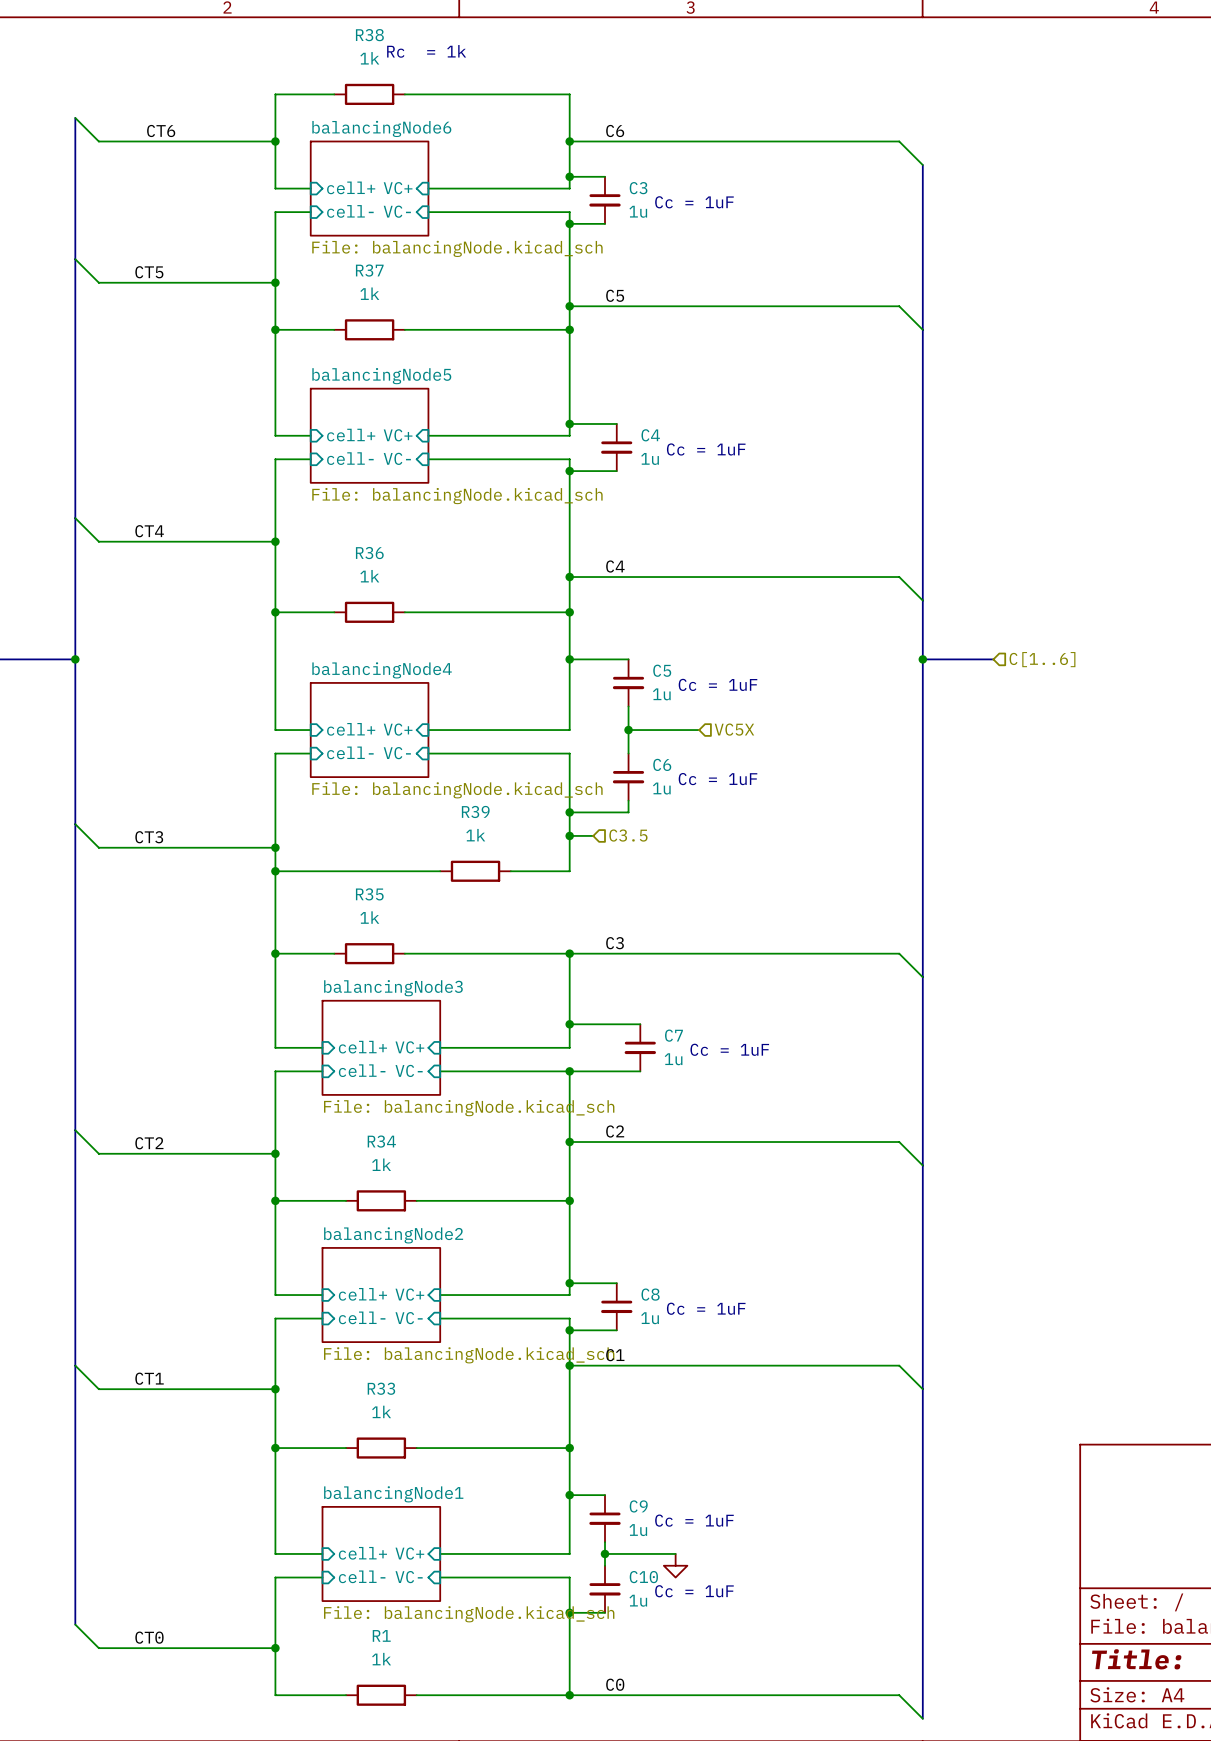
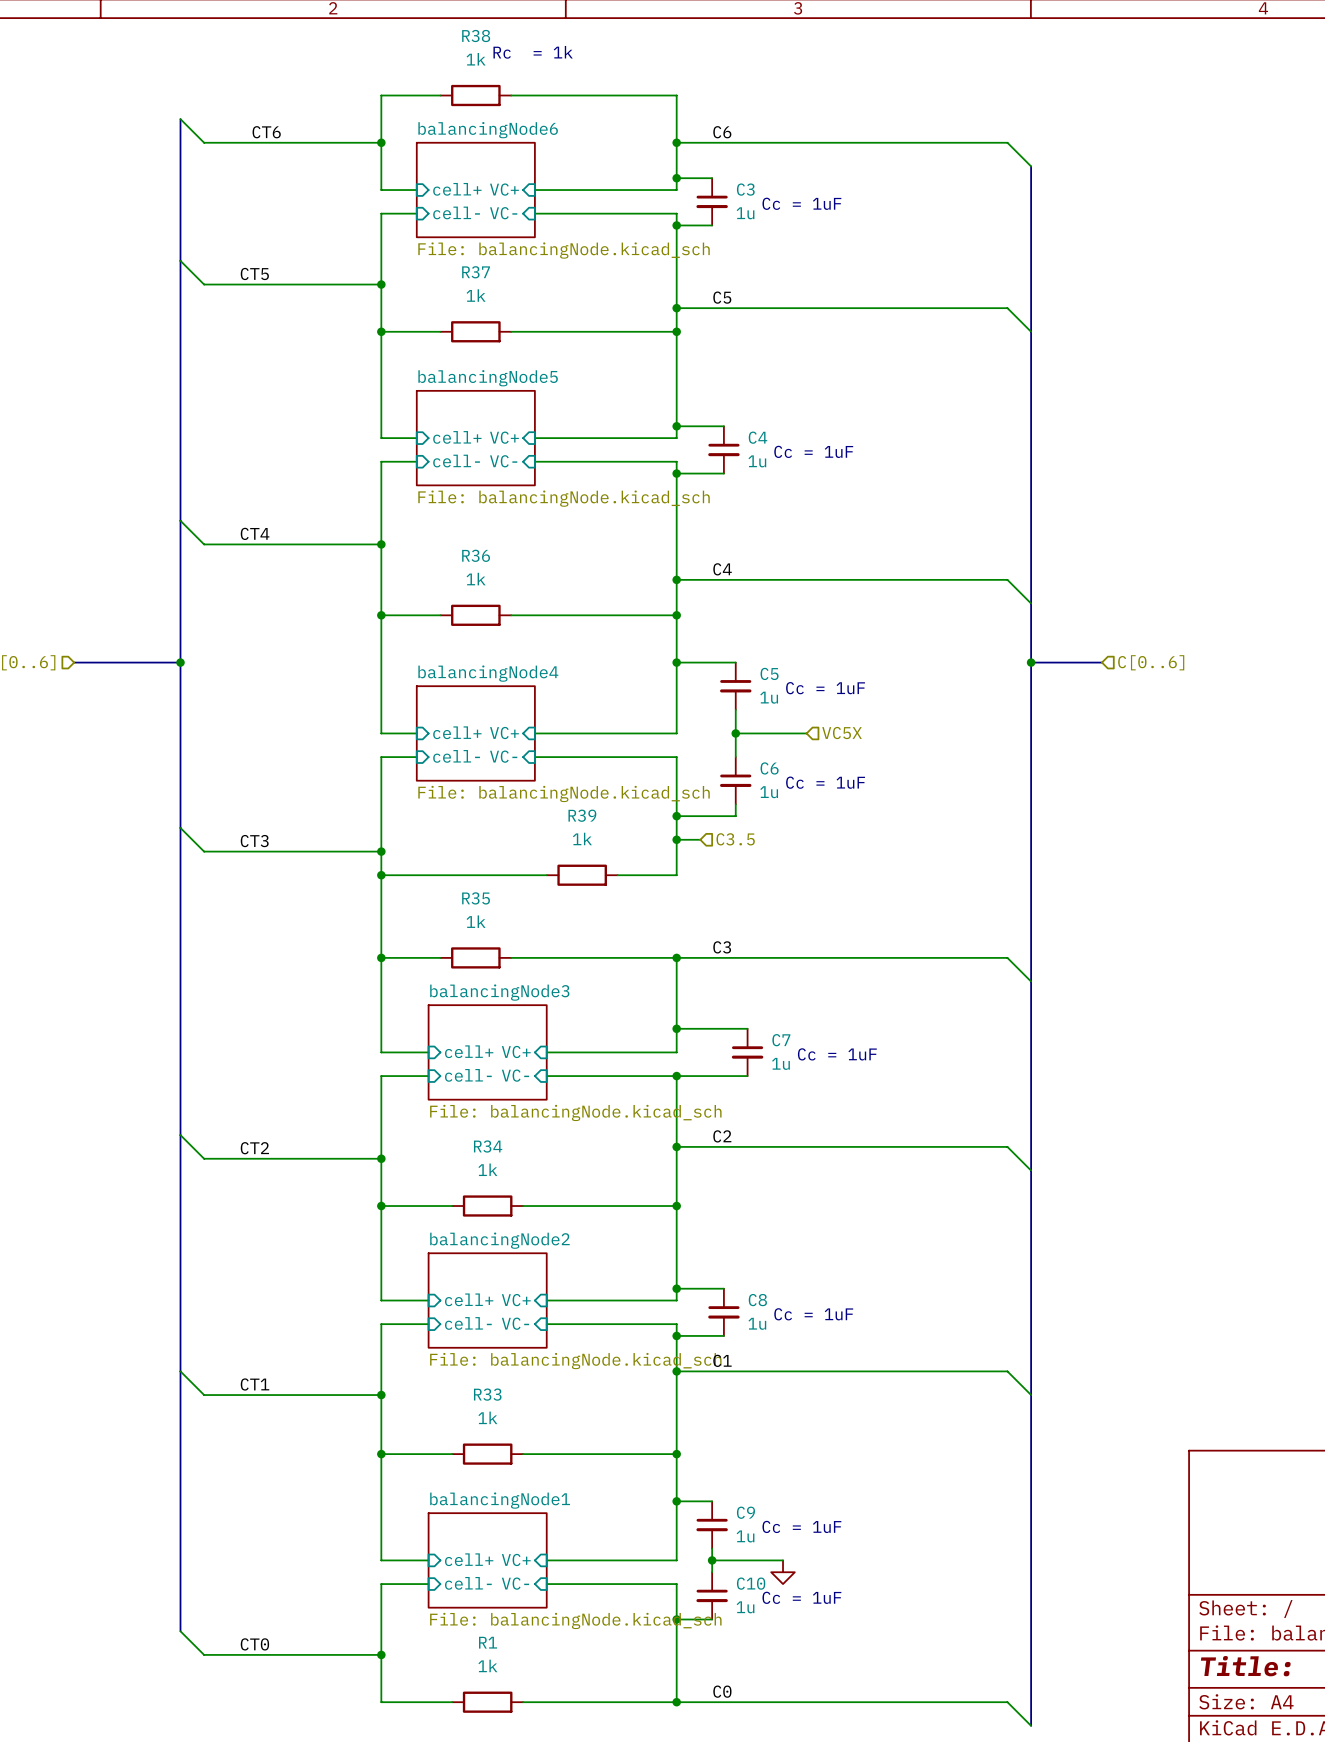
hierarchical label: C[1..6] (1042, 659) -> C[0..6] (1151, 662)

